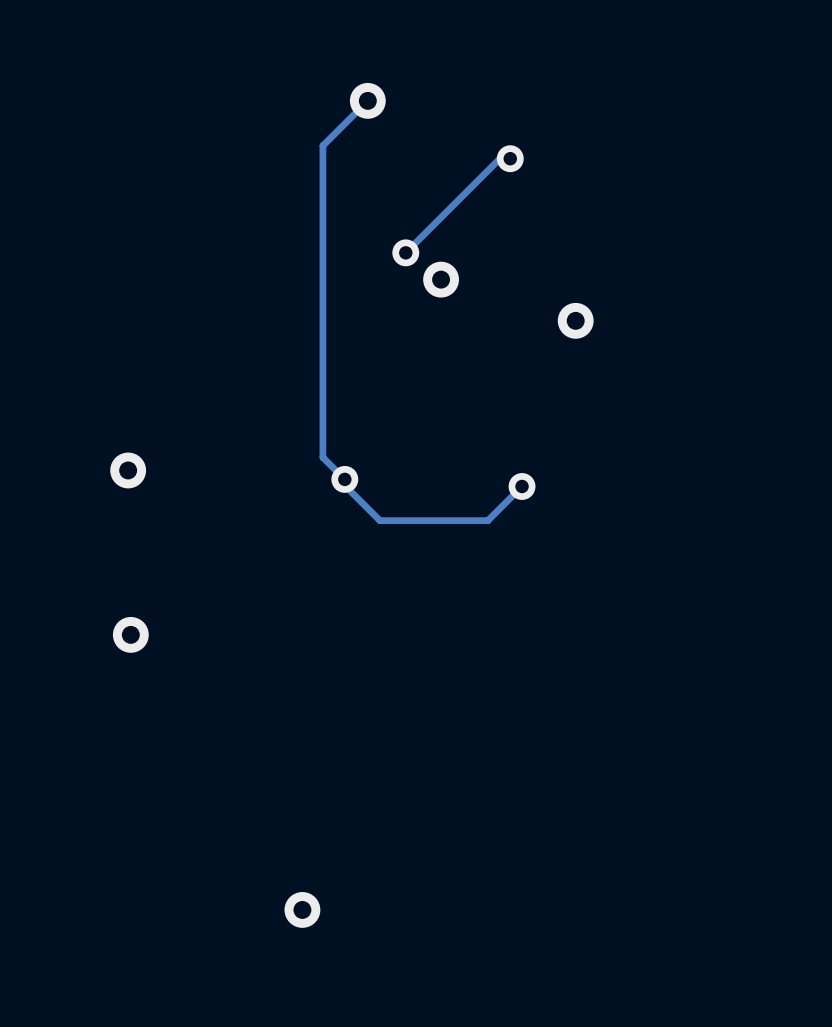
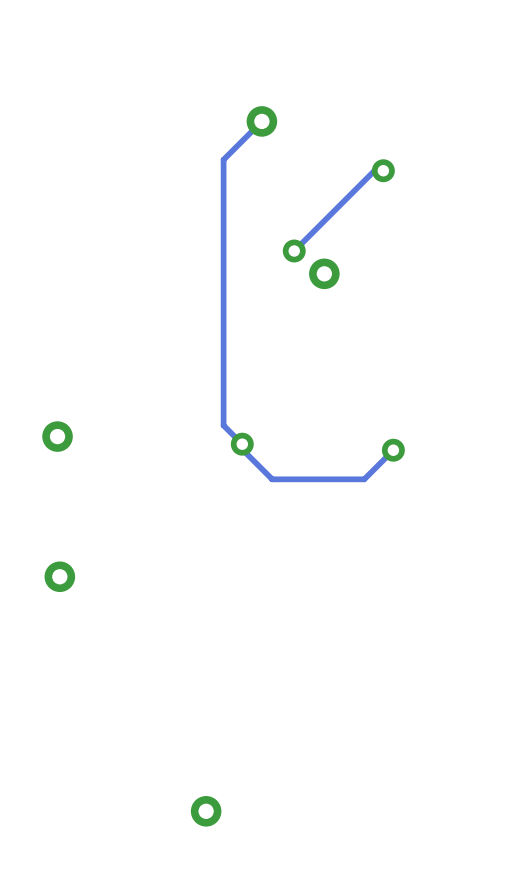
via: (575, 320) -> none

